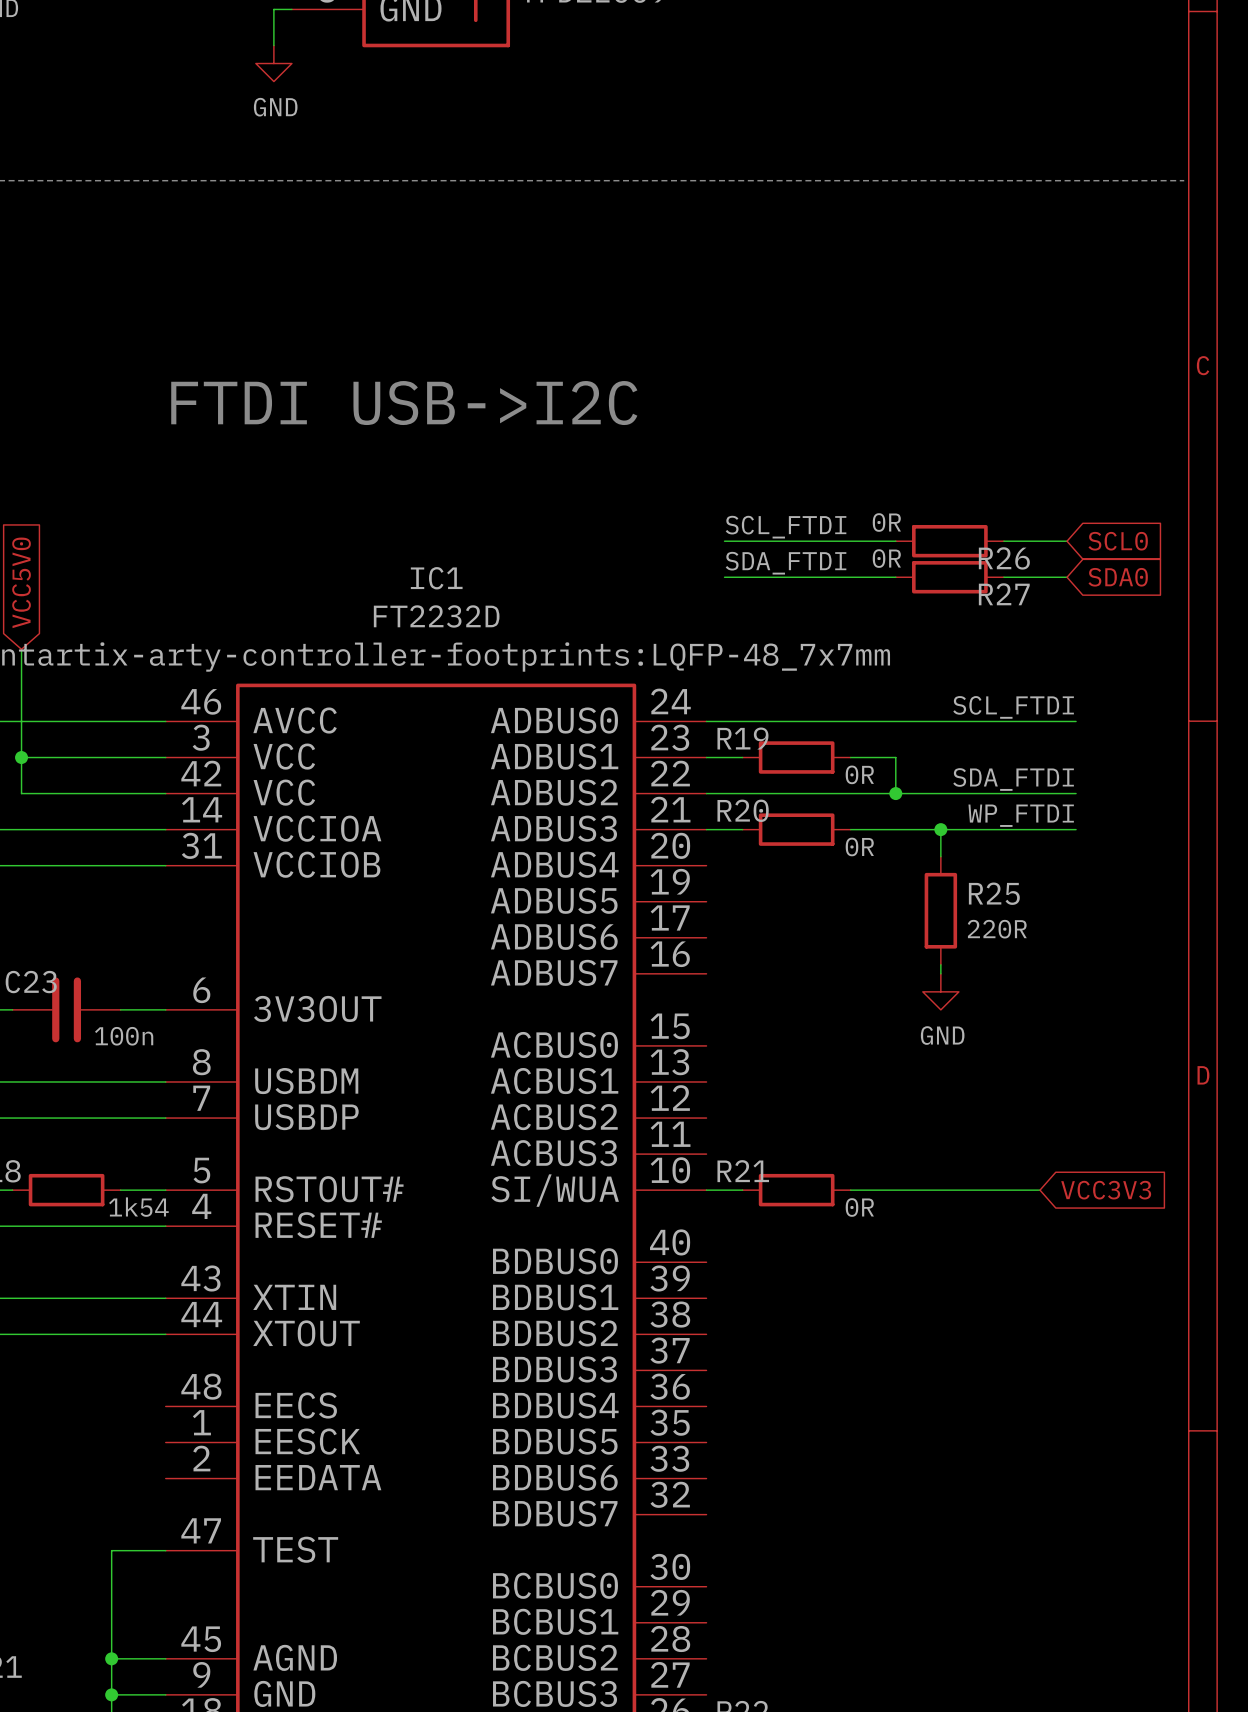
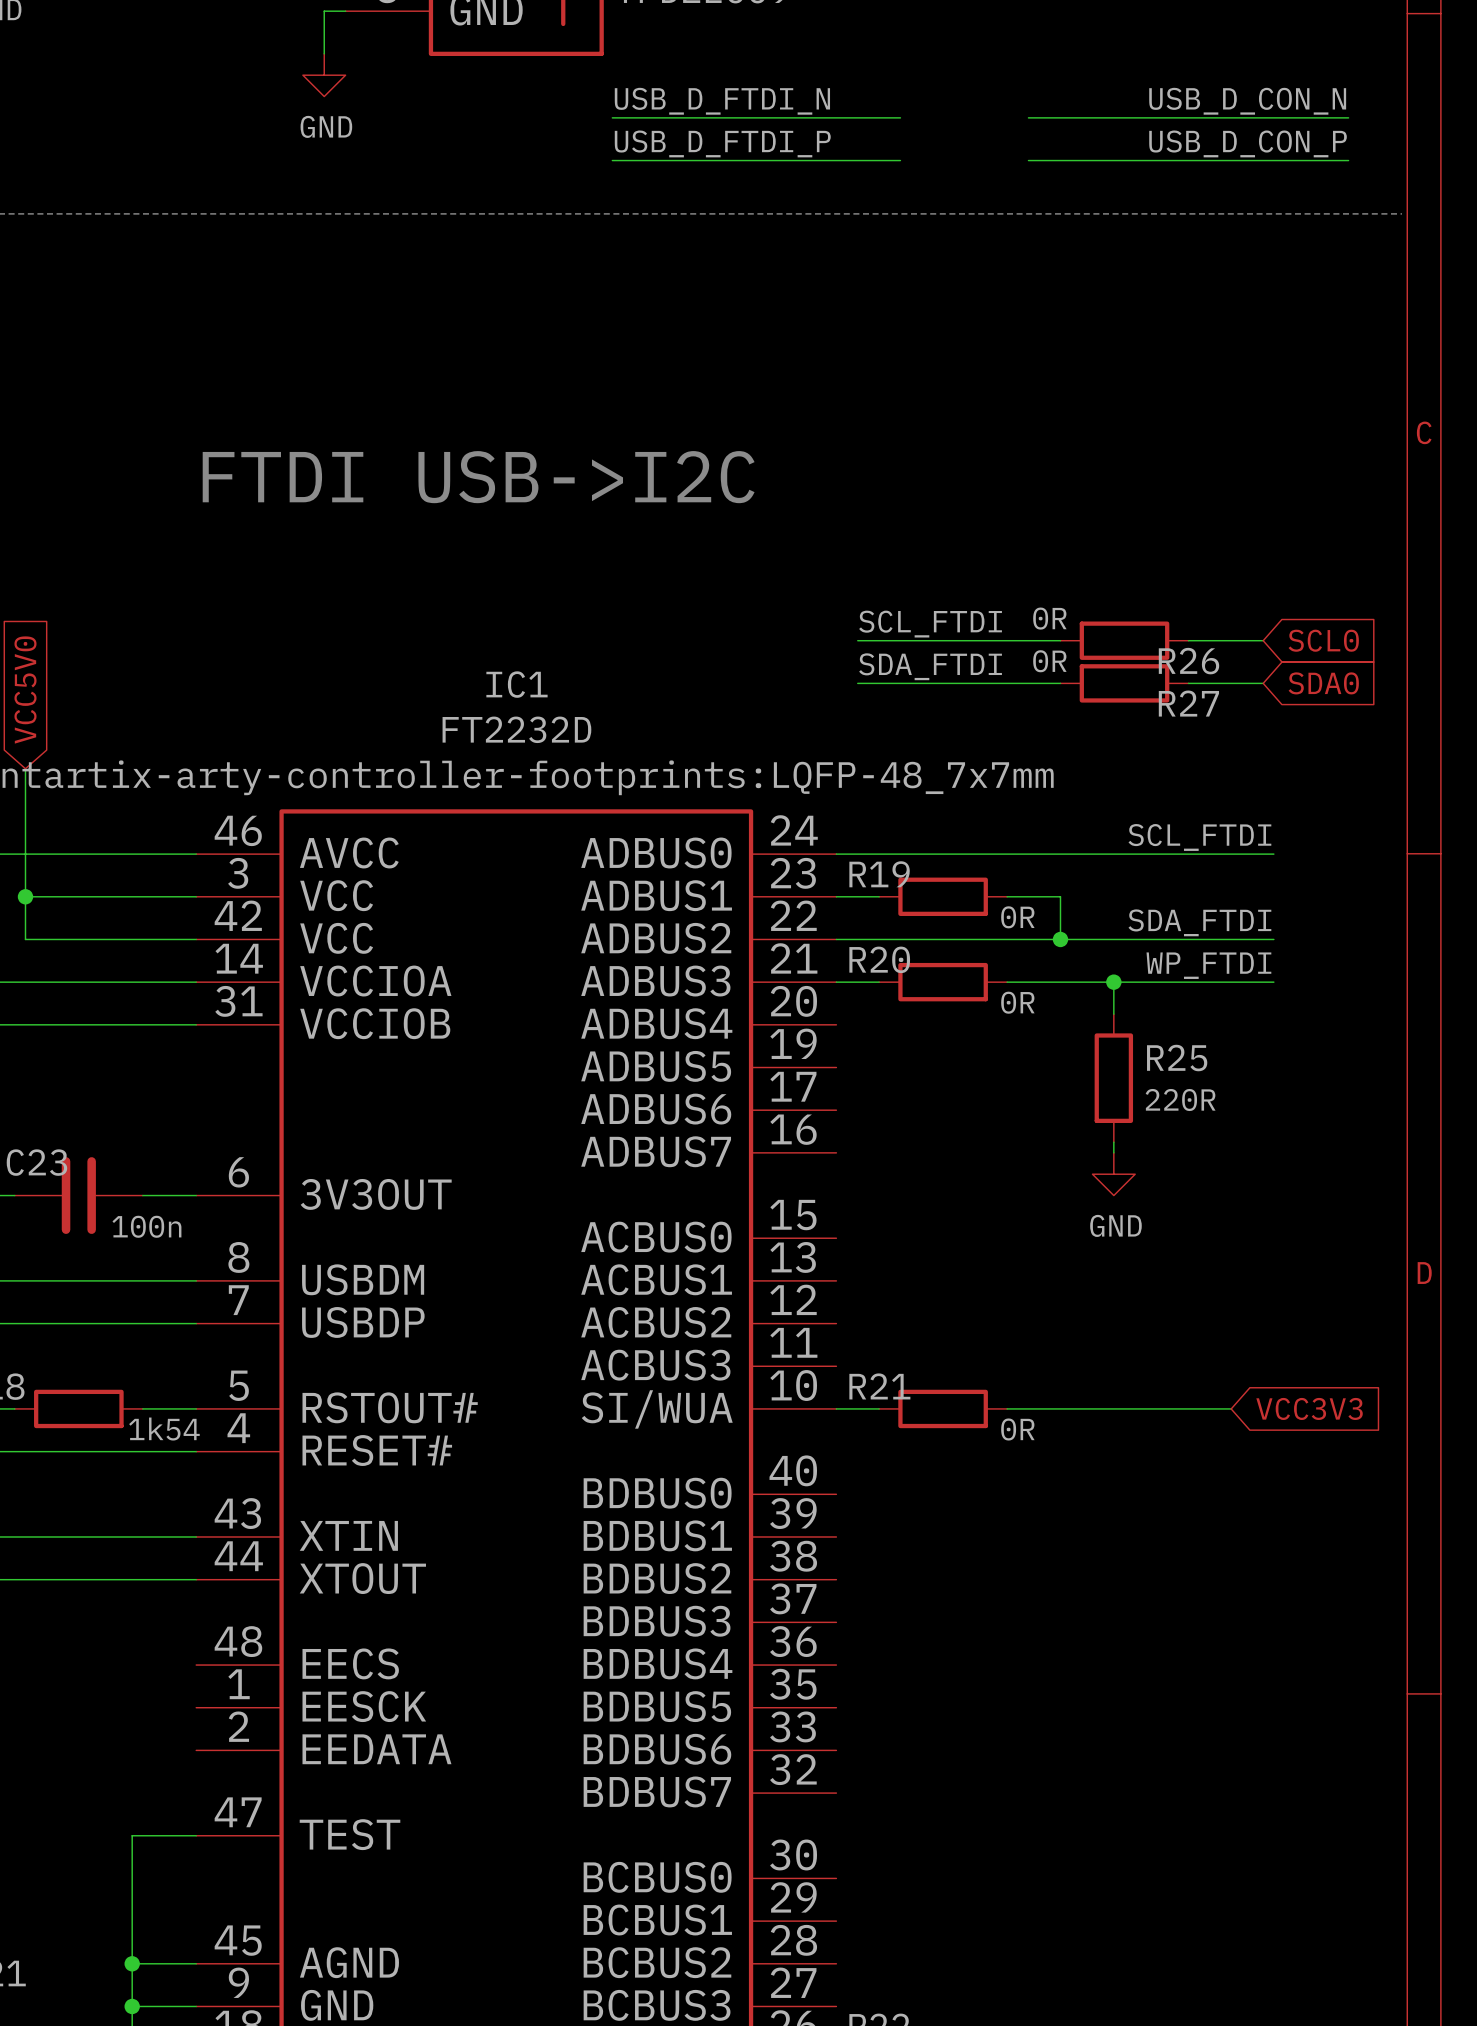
label: none -> USB_D_FTDI_N (722, 101)
label: none -> USB_D_CON_N (1247, 101)
wire: none -> (612, 117) (900, 117)
wire: none -> (1028, 117) (1348, 117)
label: none -> USB_D_FTDI_P (722, 143)
label: none -> USB_D_CON_P (1248, 143)
wire: none -> (612, 160) (900, 160)
wire: none -> (1028, 160) (1348, 160)

